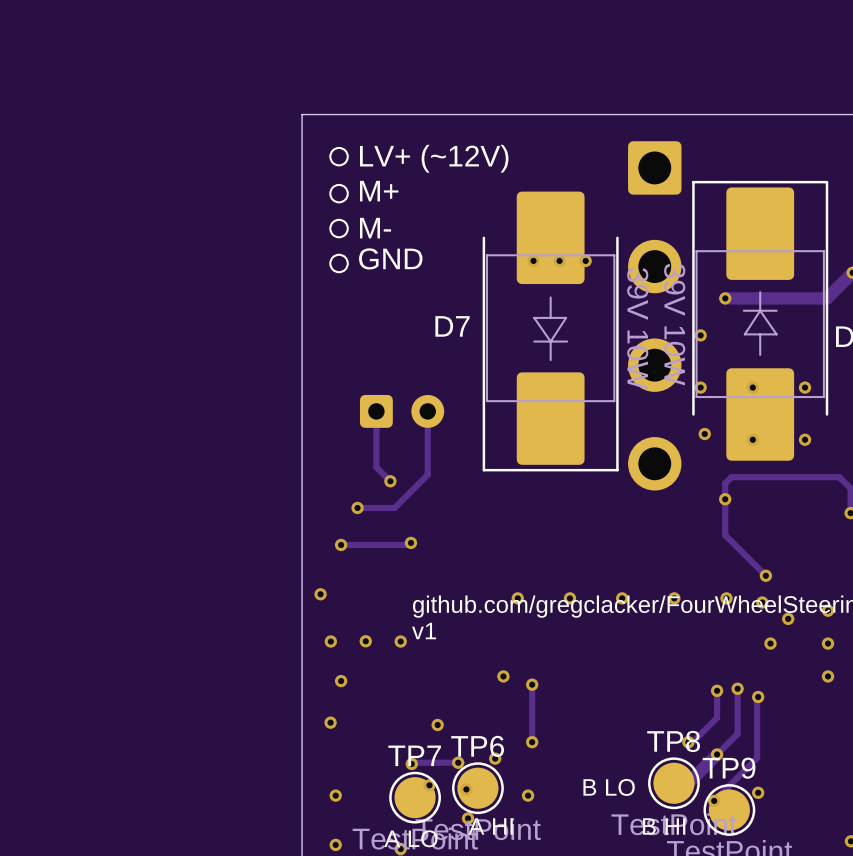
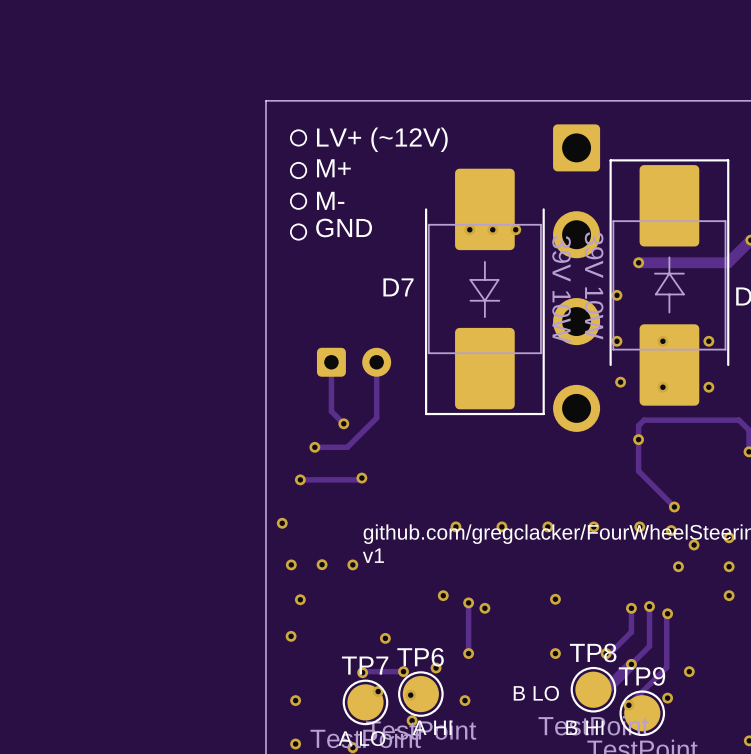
via: none -> (555, 599)
via: none -> (484, 608)
via: none -> (555, 653)
via: none -> (689, 671)

